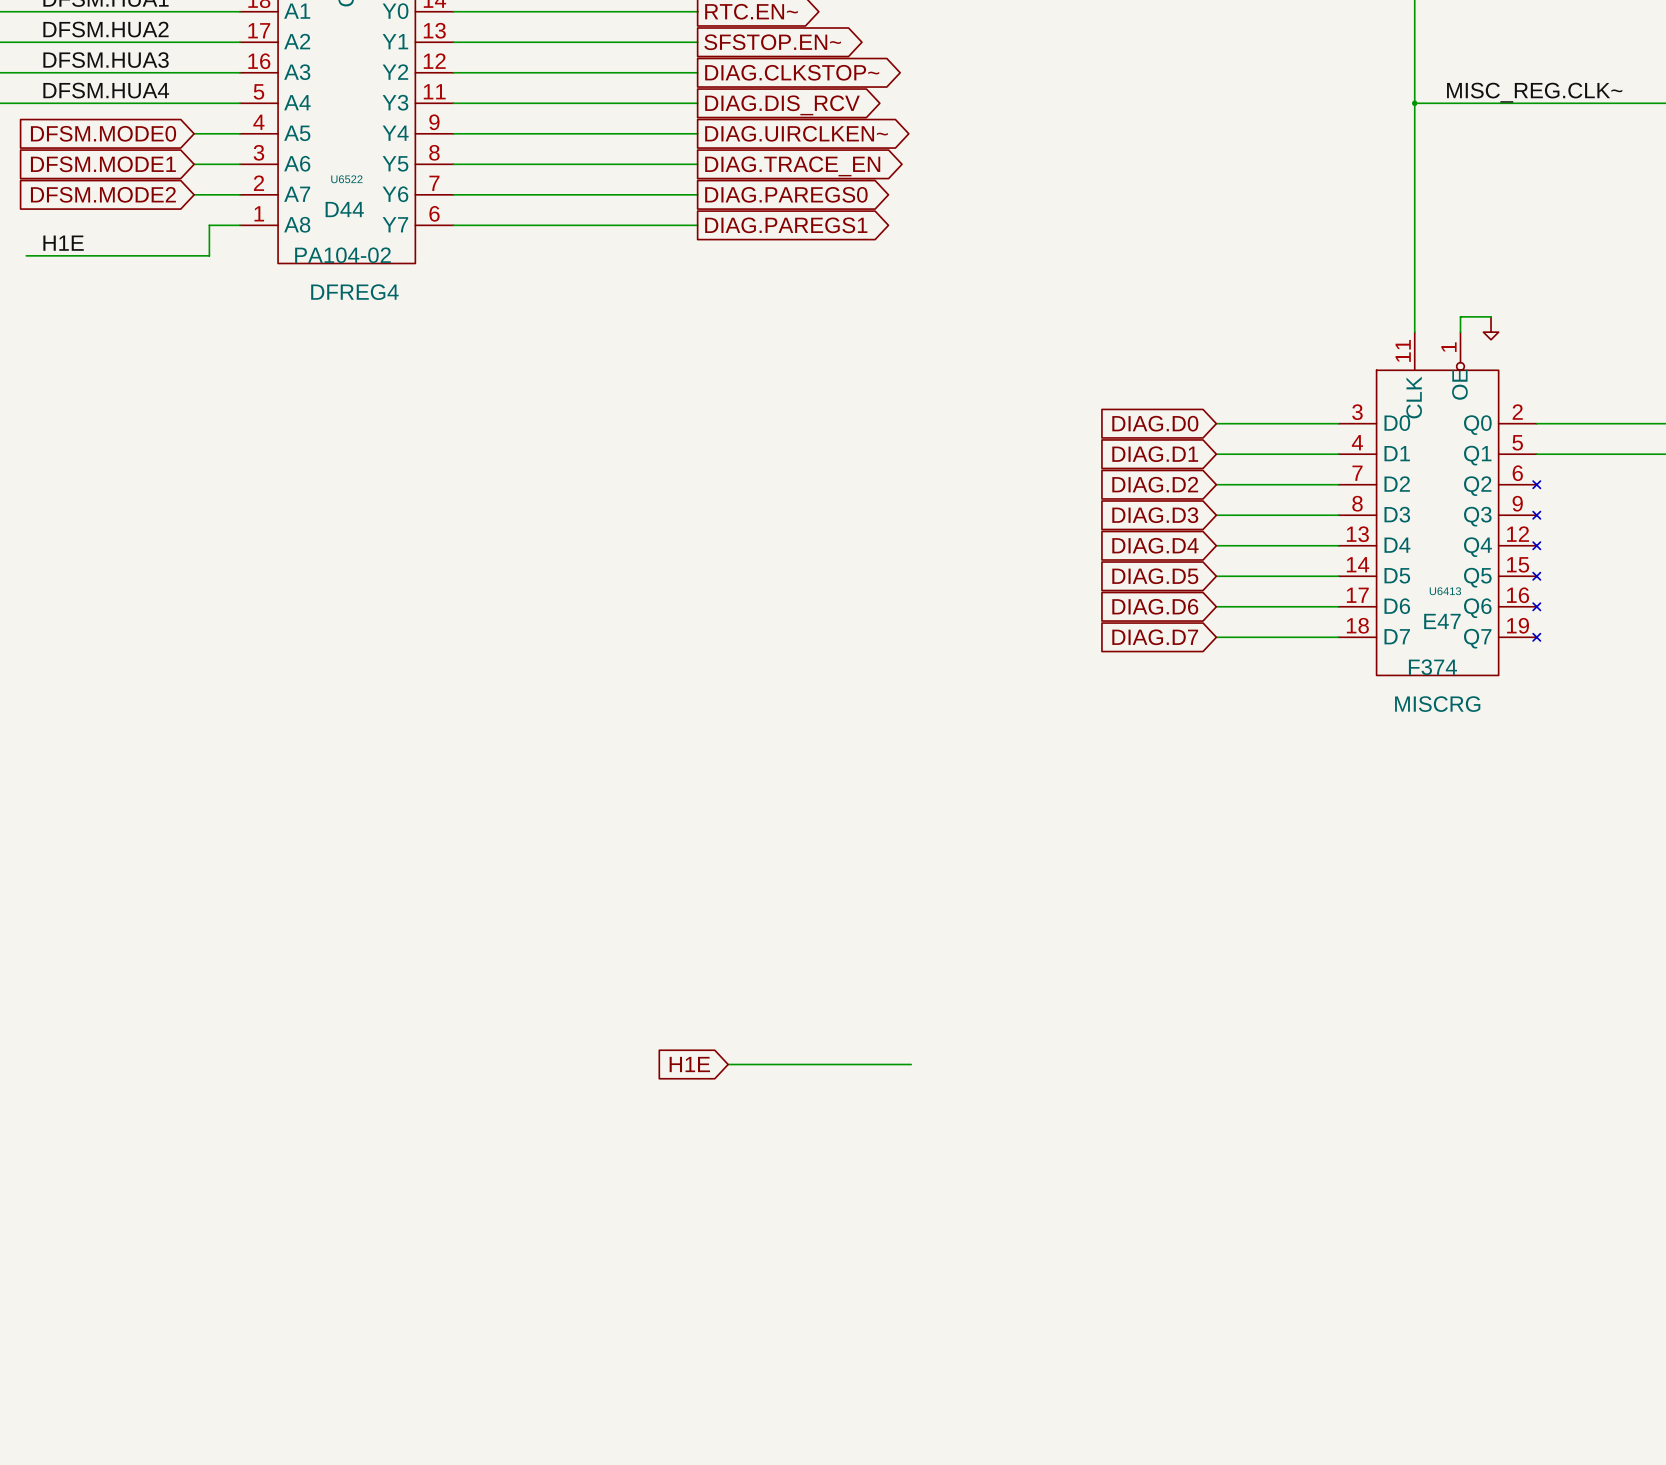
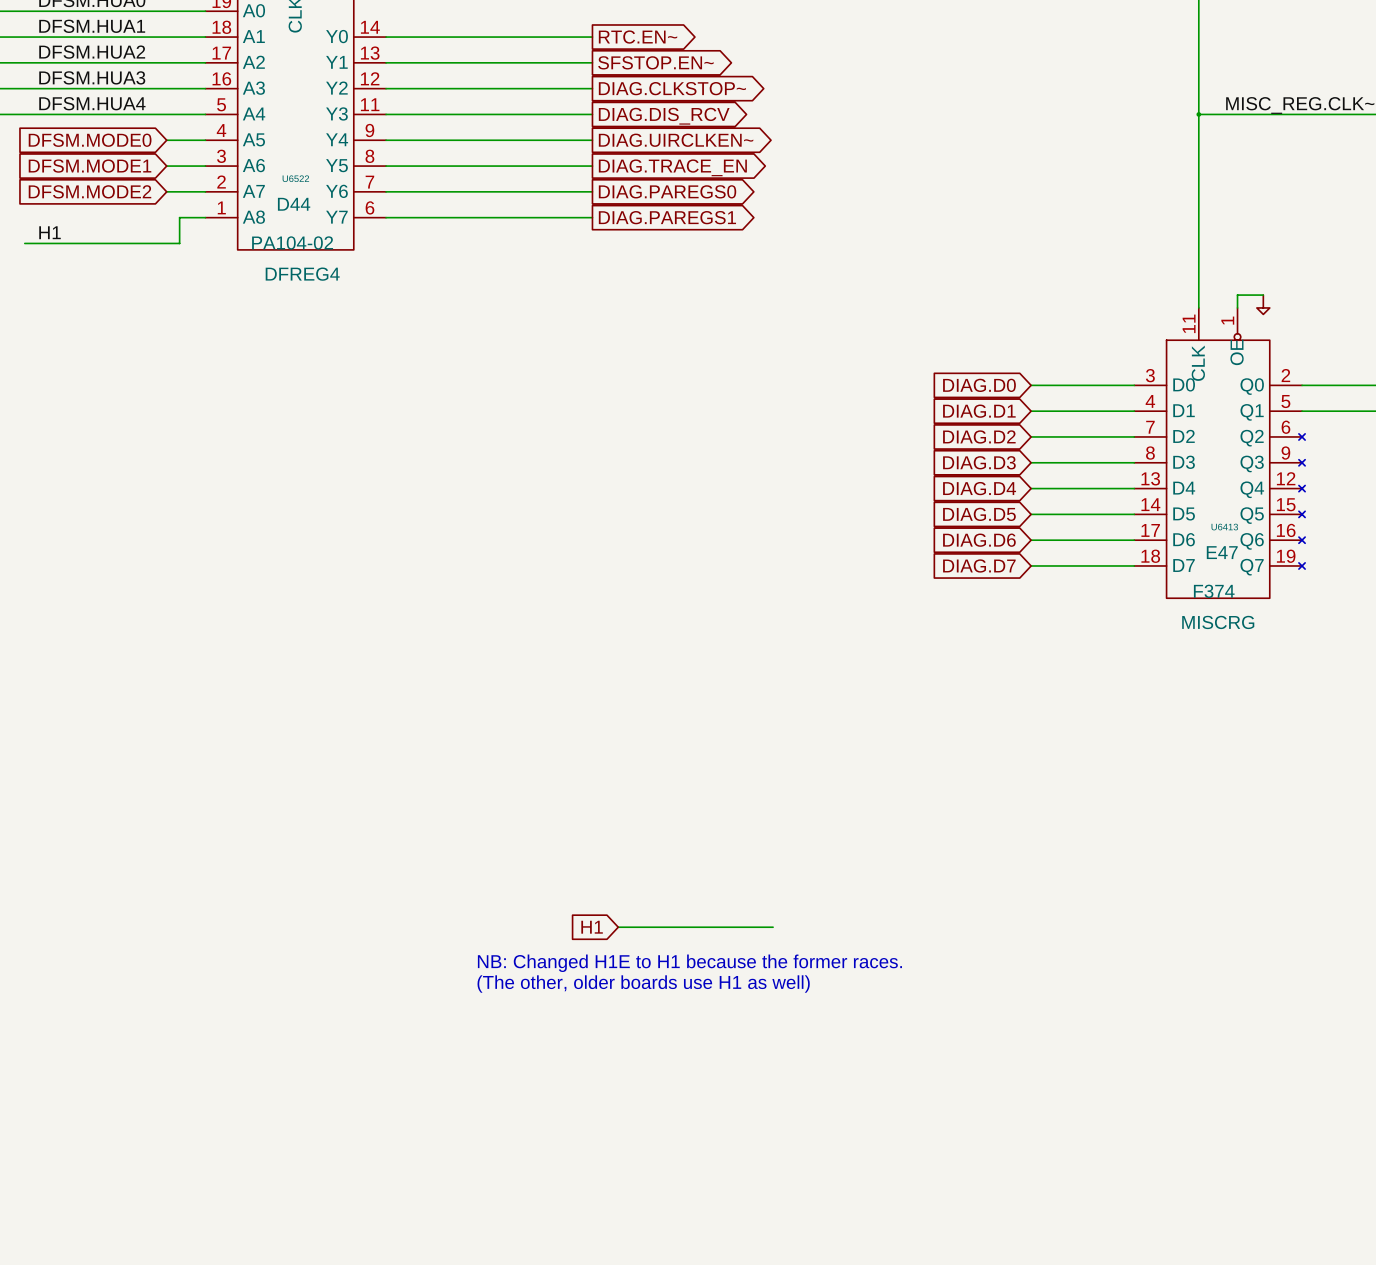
label: H1E (63, 243) -> H1 (50, 232)
global label: H1E (689, 1064) -> H1 (592, 927)
text: none -> NB: Changed H1E to H1 because the former races. (689, 963)
text: none -> (The other, older boards use H1 as well) (643, 984)

